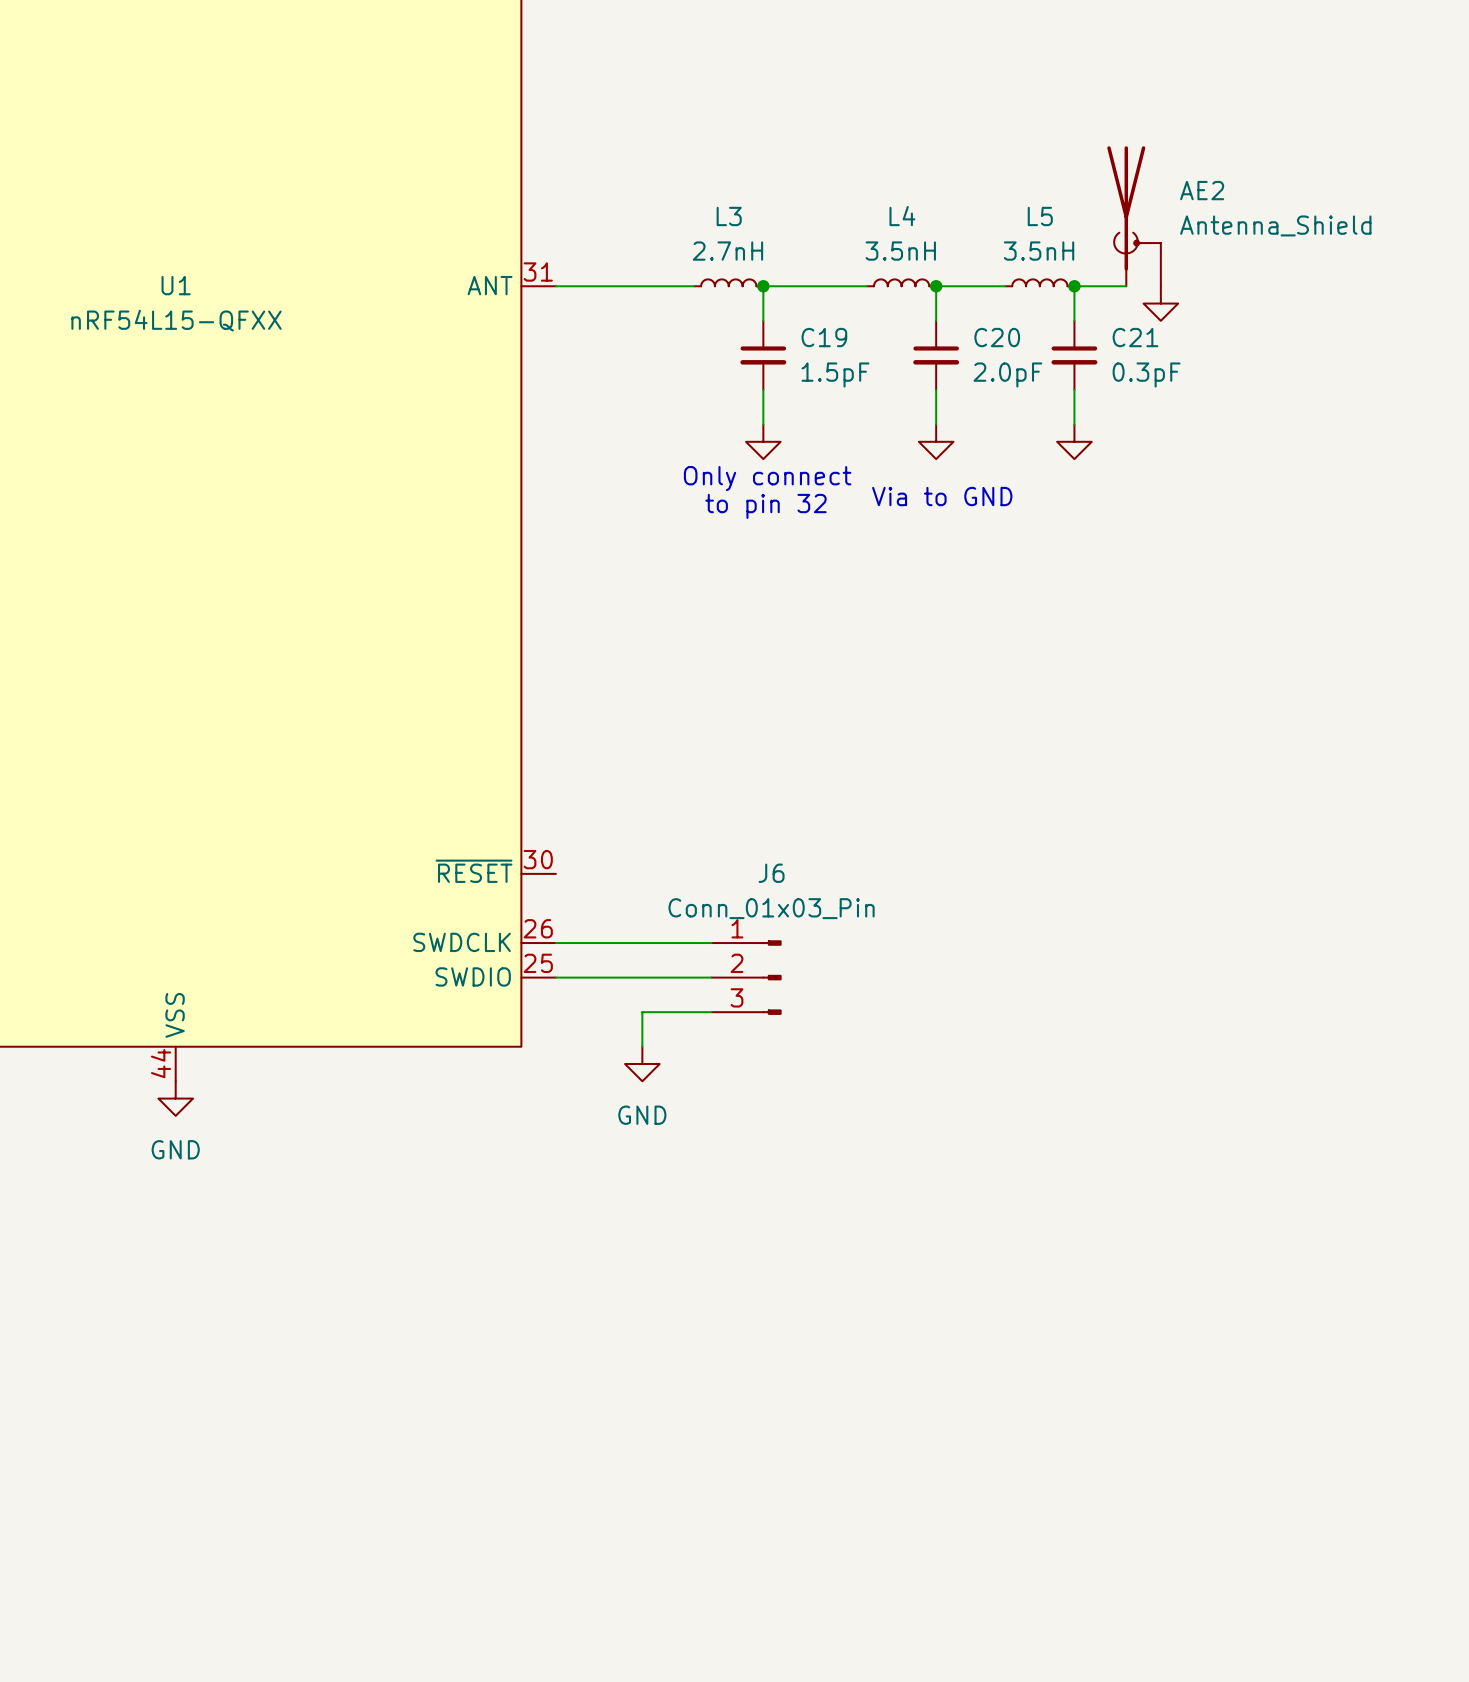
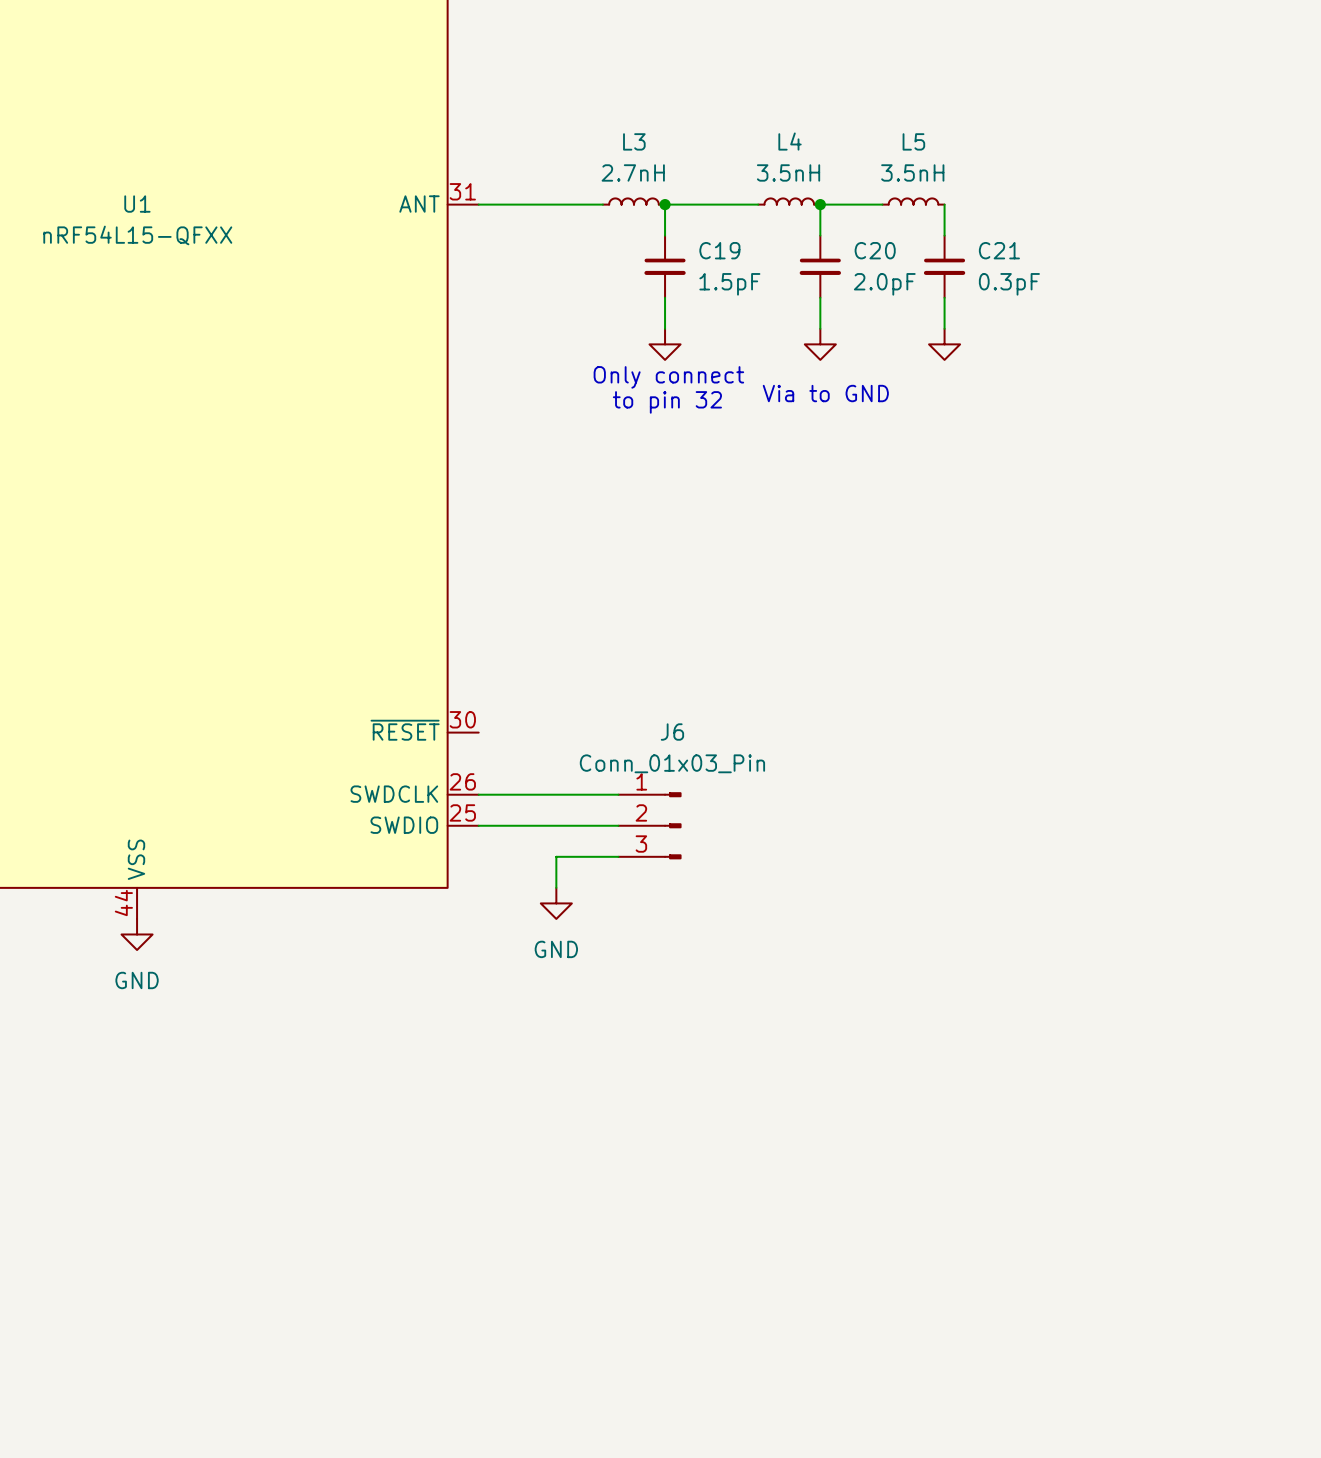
AE2: Antenna_Shield (1134, 216) -> none
wire: (1074, 286) (1126, 286) -> none
junction: (1074, 286) -> none
power symbol: (1160, 303) -> none

